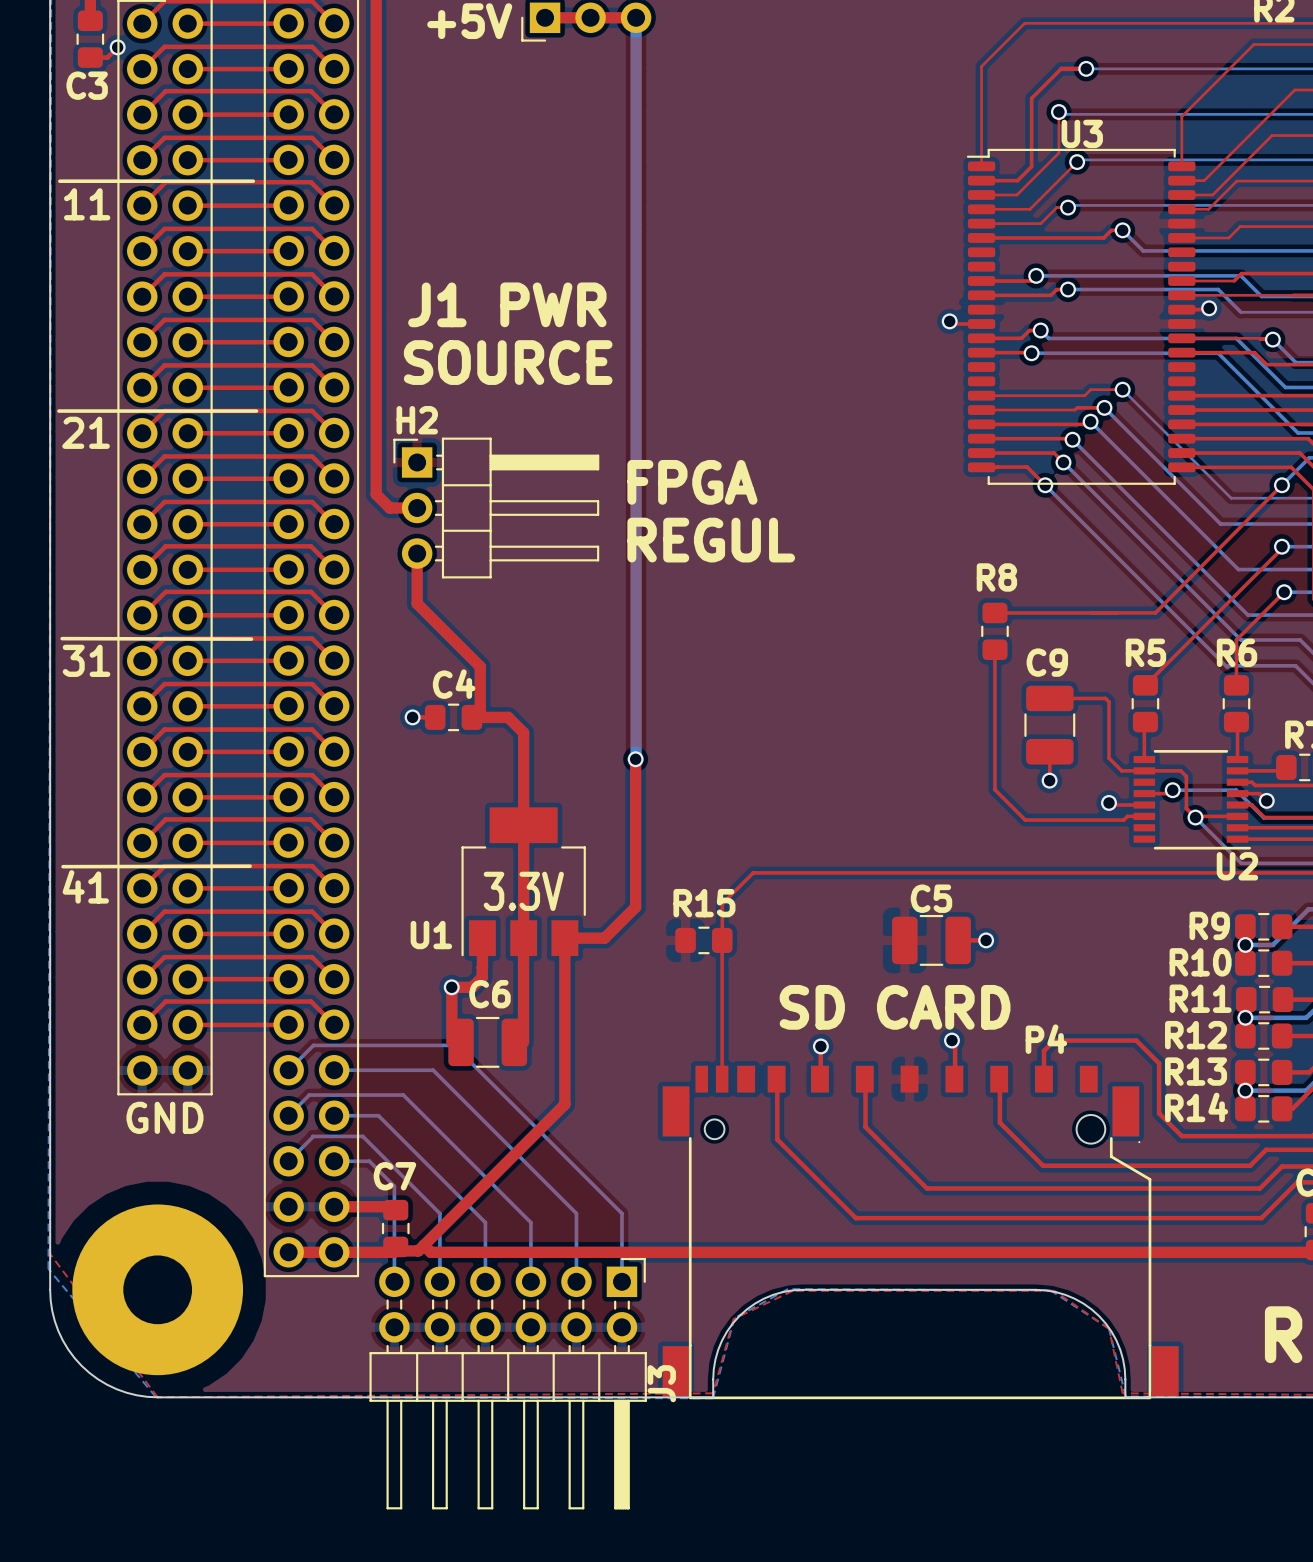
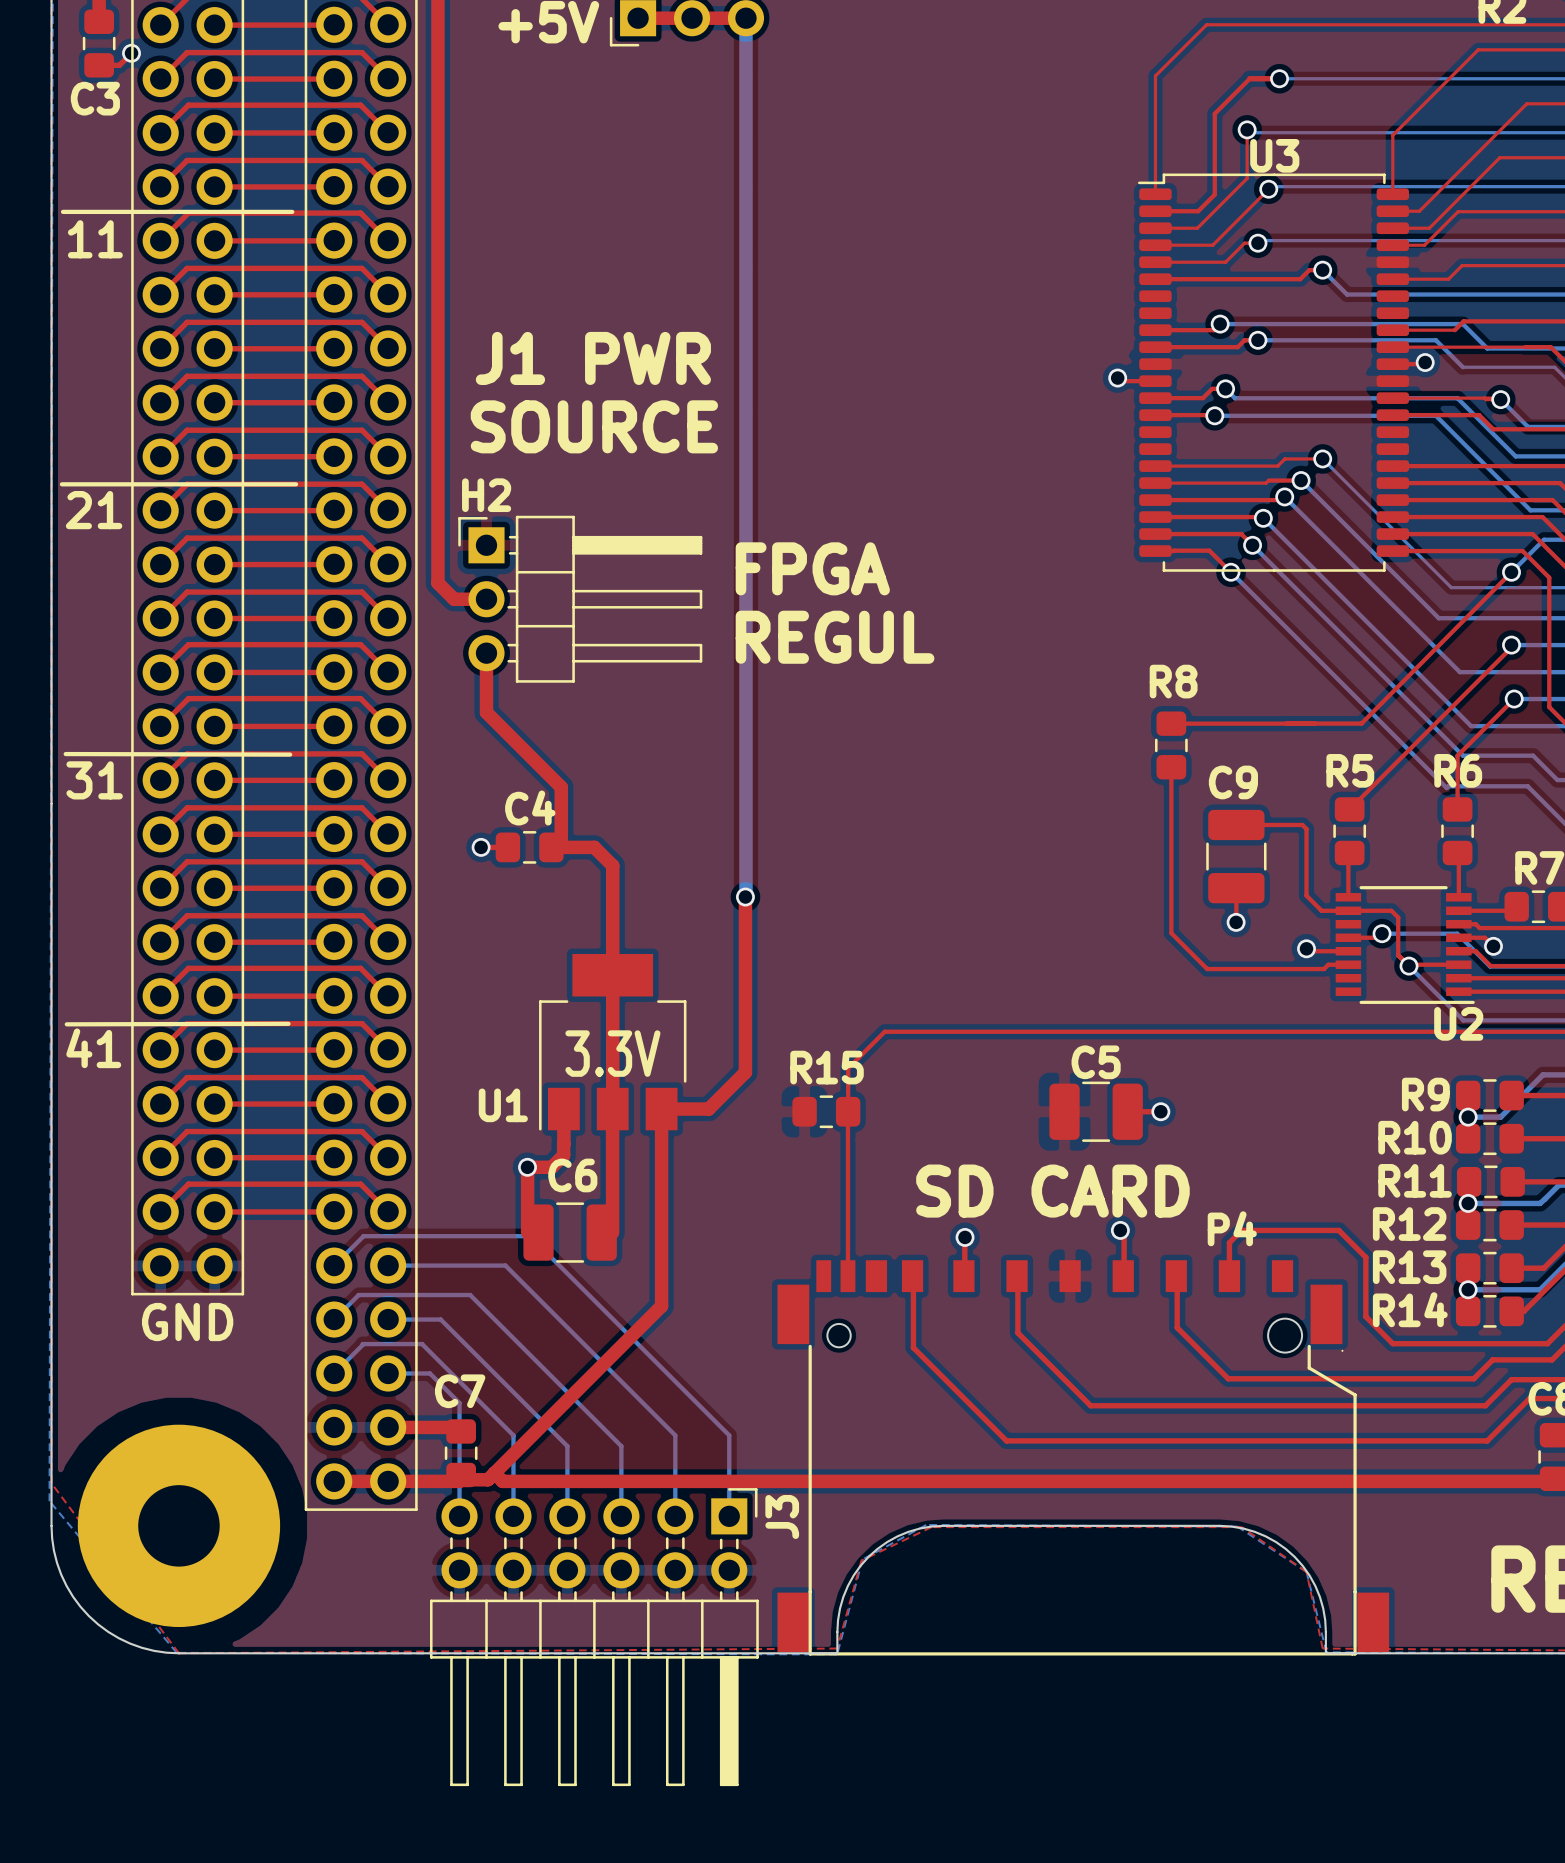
J3 name position: J3 (661, 1383) -> J3 (782, 1516)

